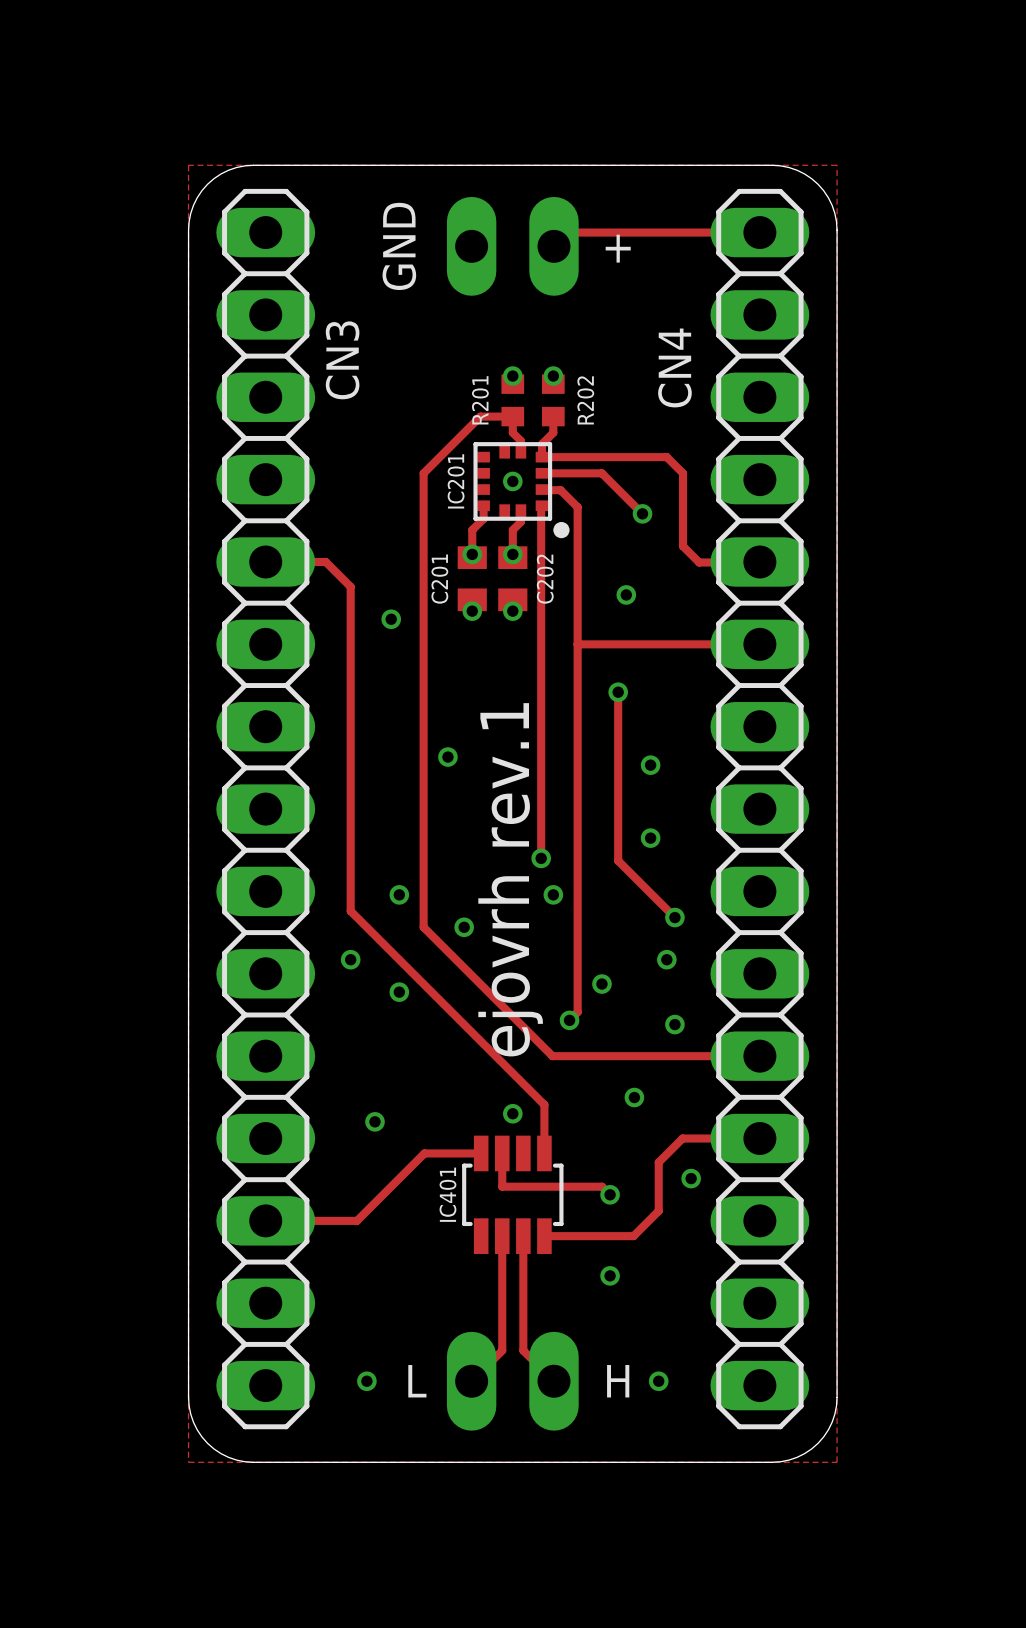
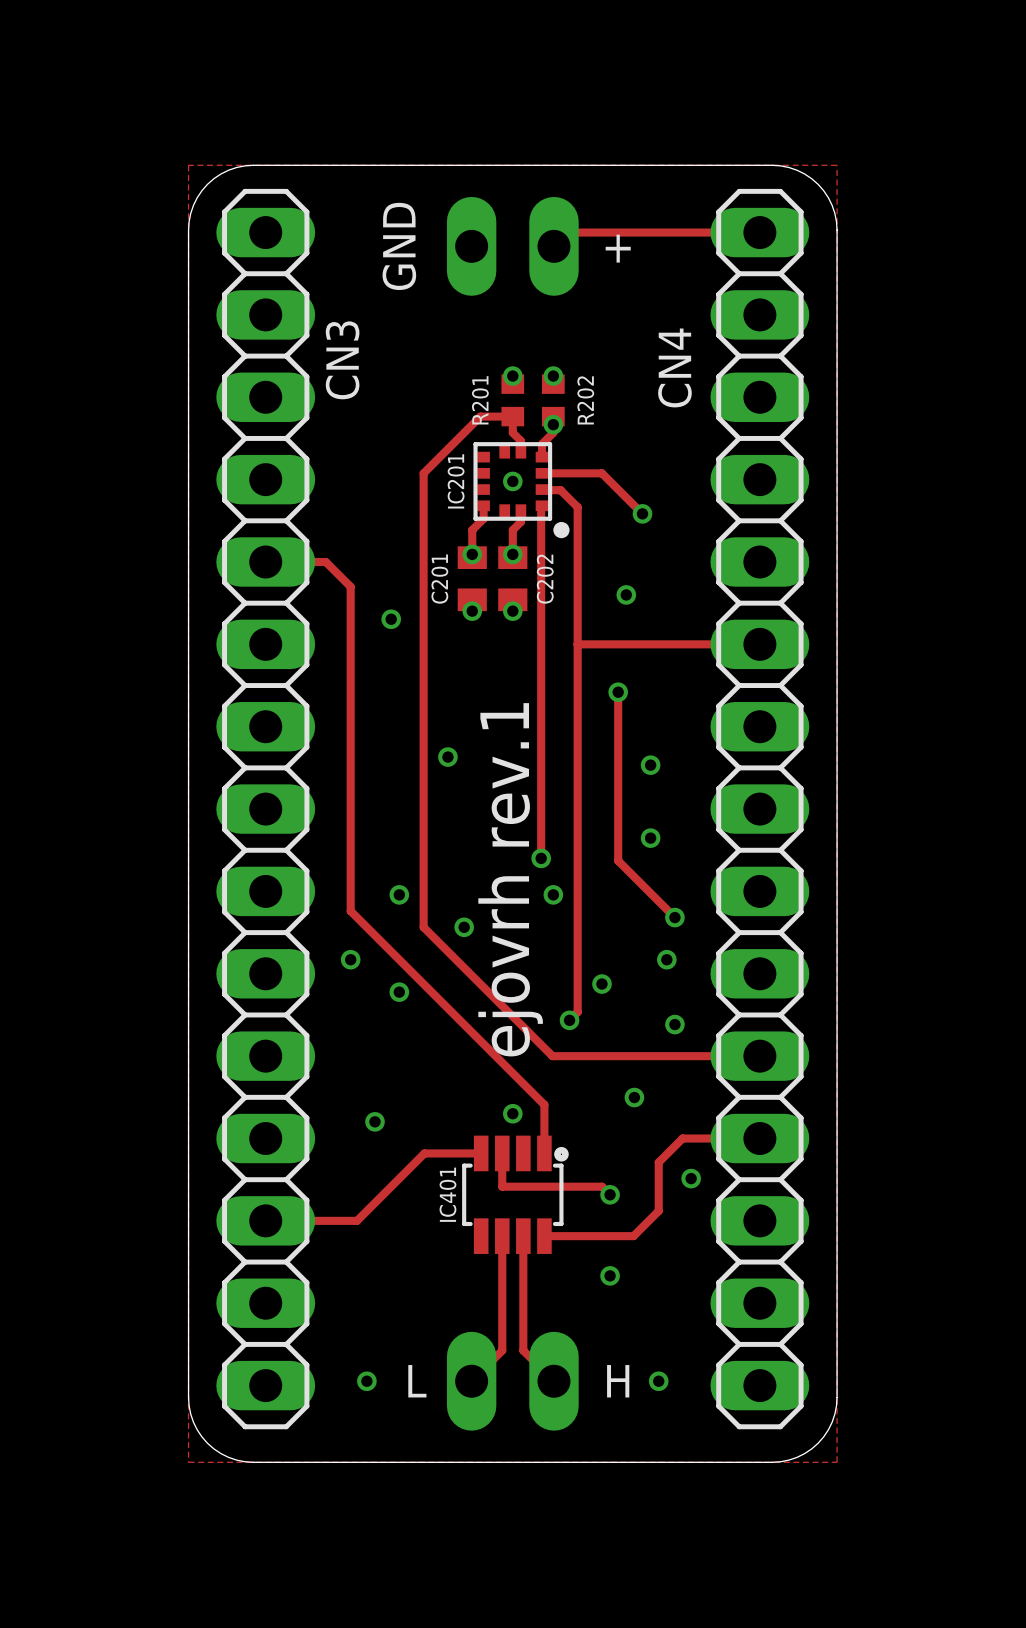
via: none -> (553, 424)
track: (541, 457) (666, 457) (683, 473) (683, 546) (699, 562) (759, 561) -> none
IC401 footprint: [462, 1135, 564, 1254] -> [462, 1135, 569, 1254]

